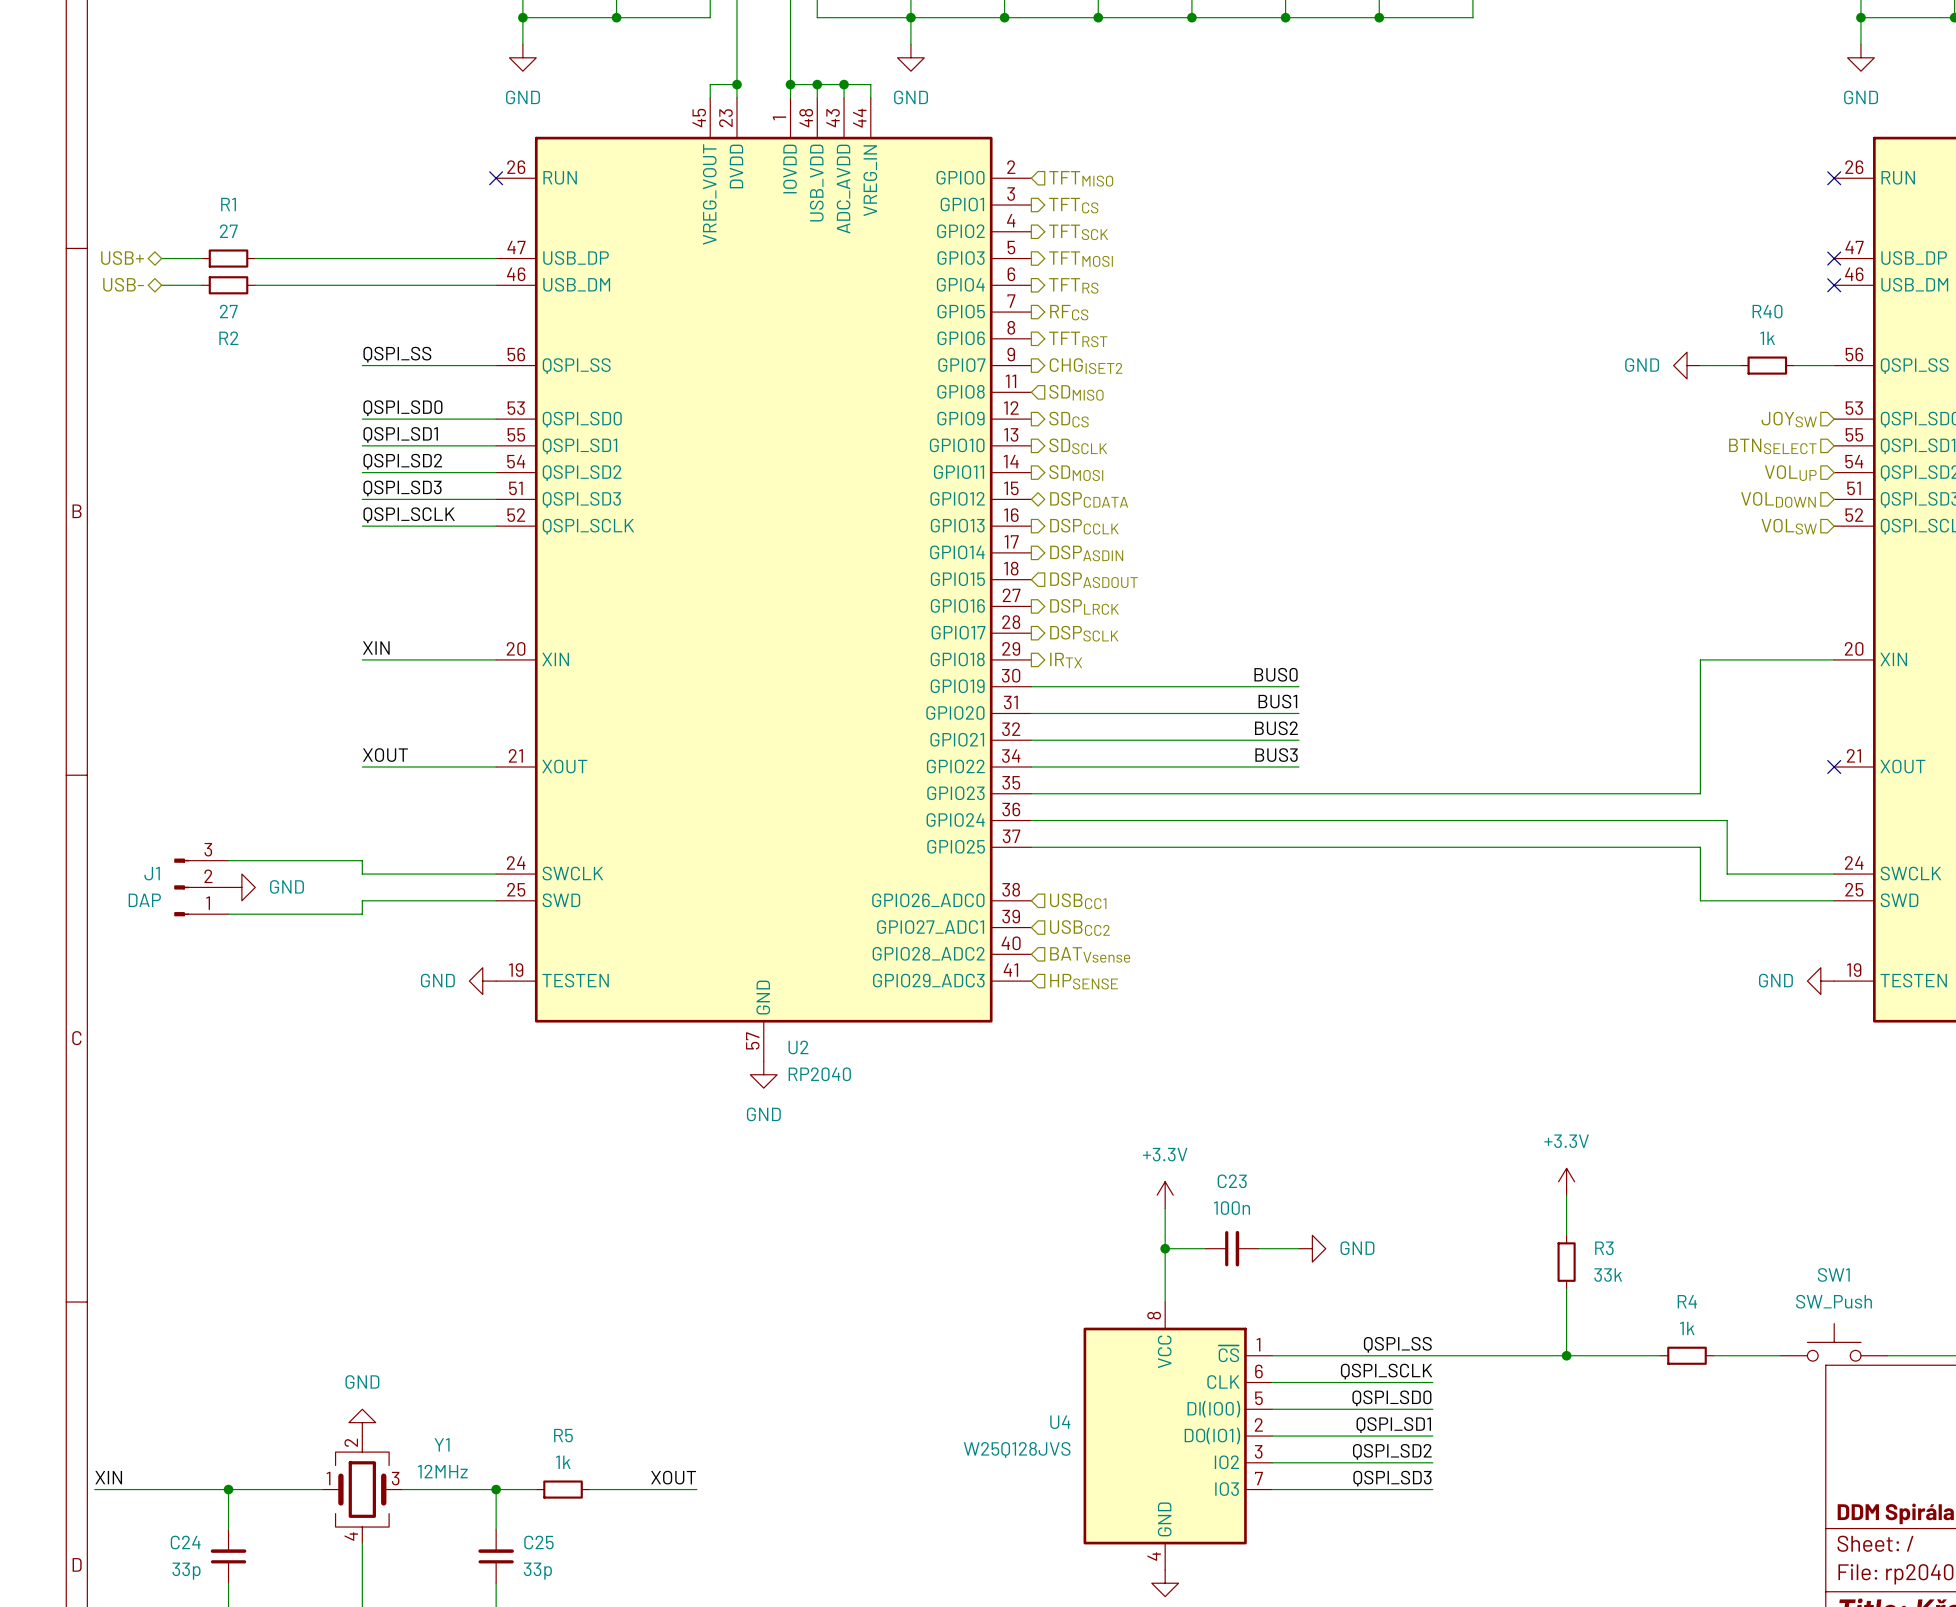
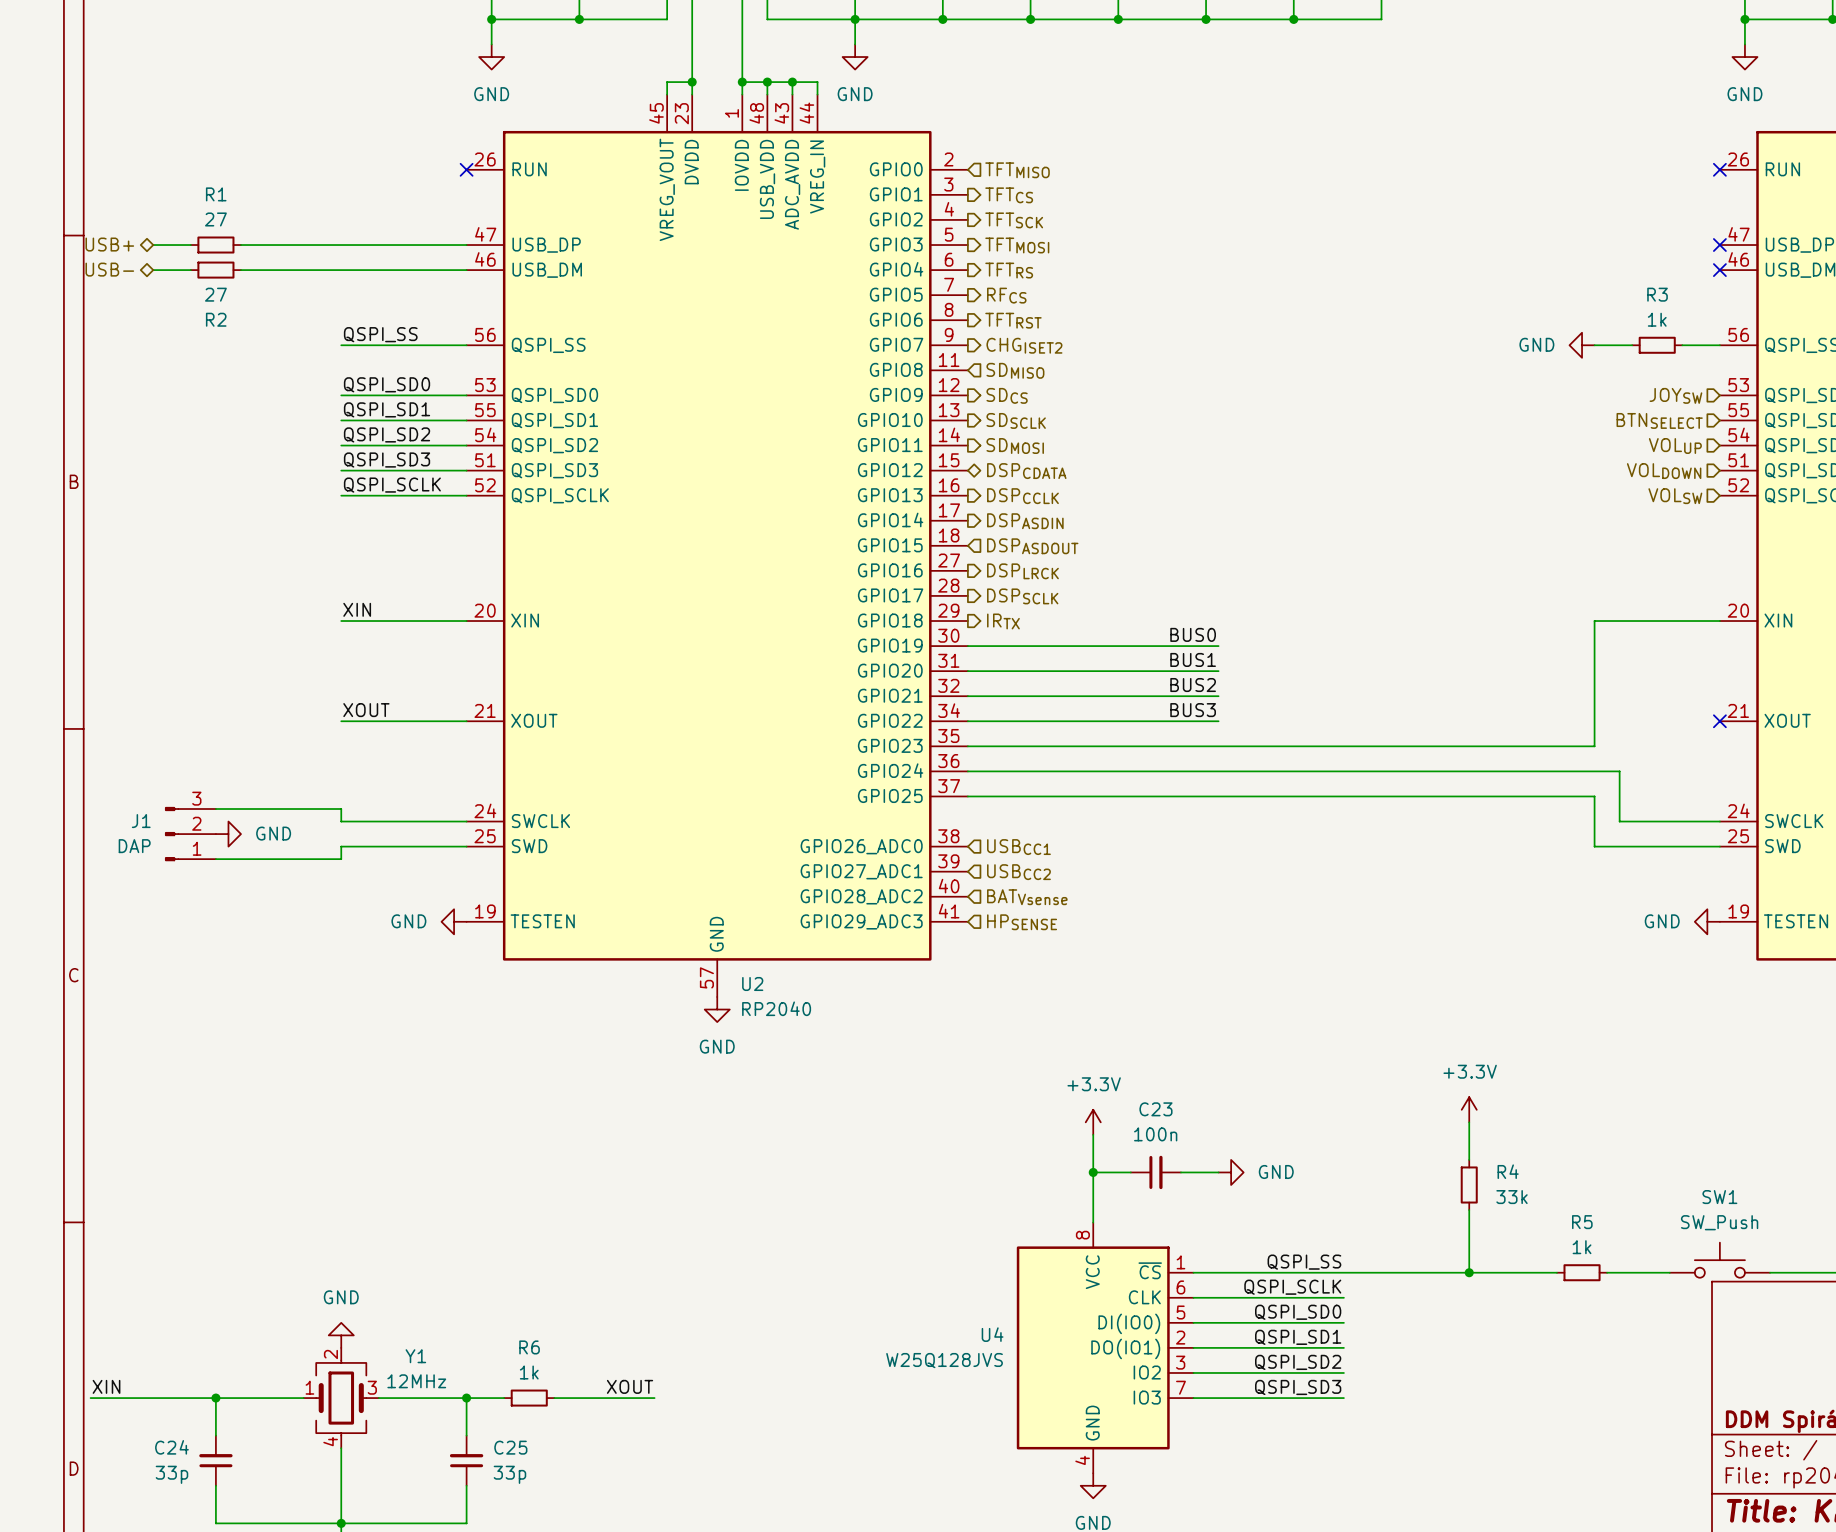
R40 name: R40 (1767, 311) -> R3 (1657, 294)
R3 name: R3 (1604, 1248) -> R4 (1508, 1171)
R4 name: R4 (1687, 1301) -> R5 (1582, 1222)
R5 name: R5 (563, 1435) -> R6 (529, 1347)

